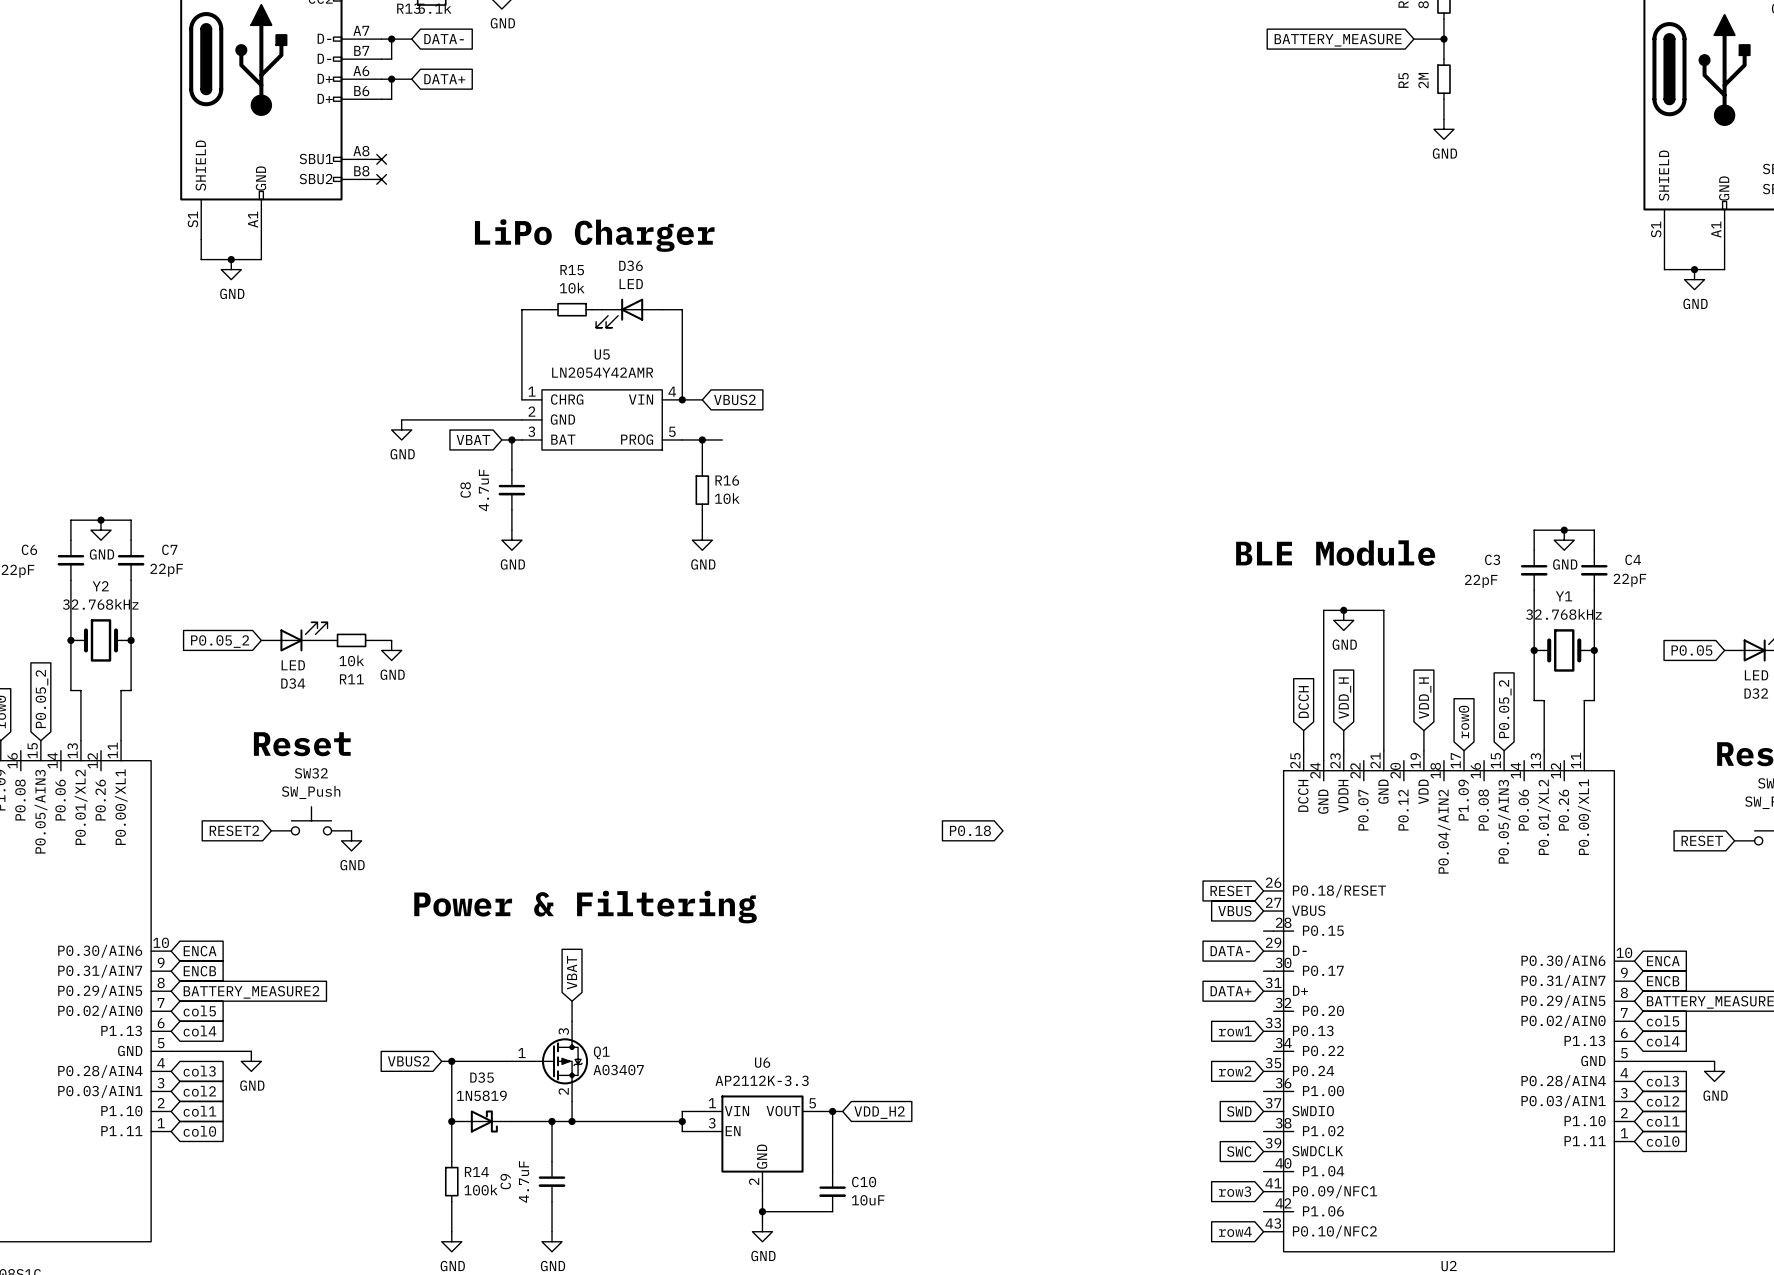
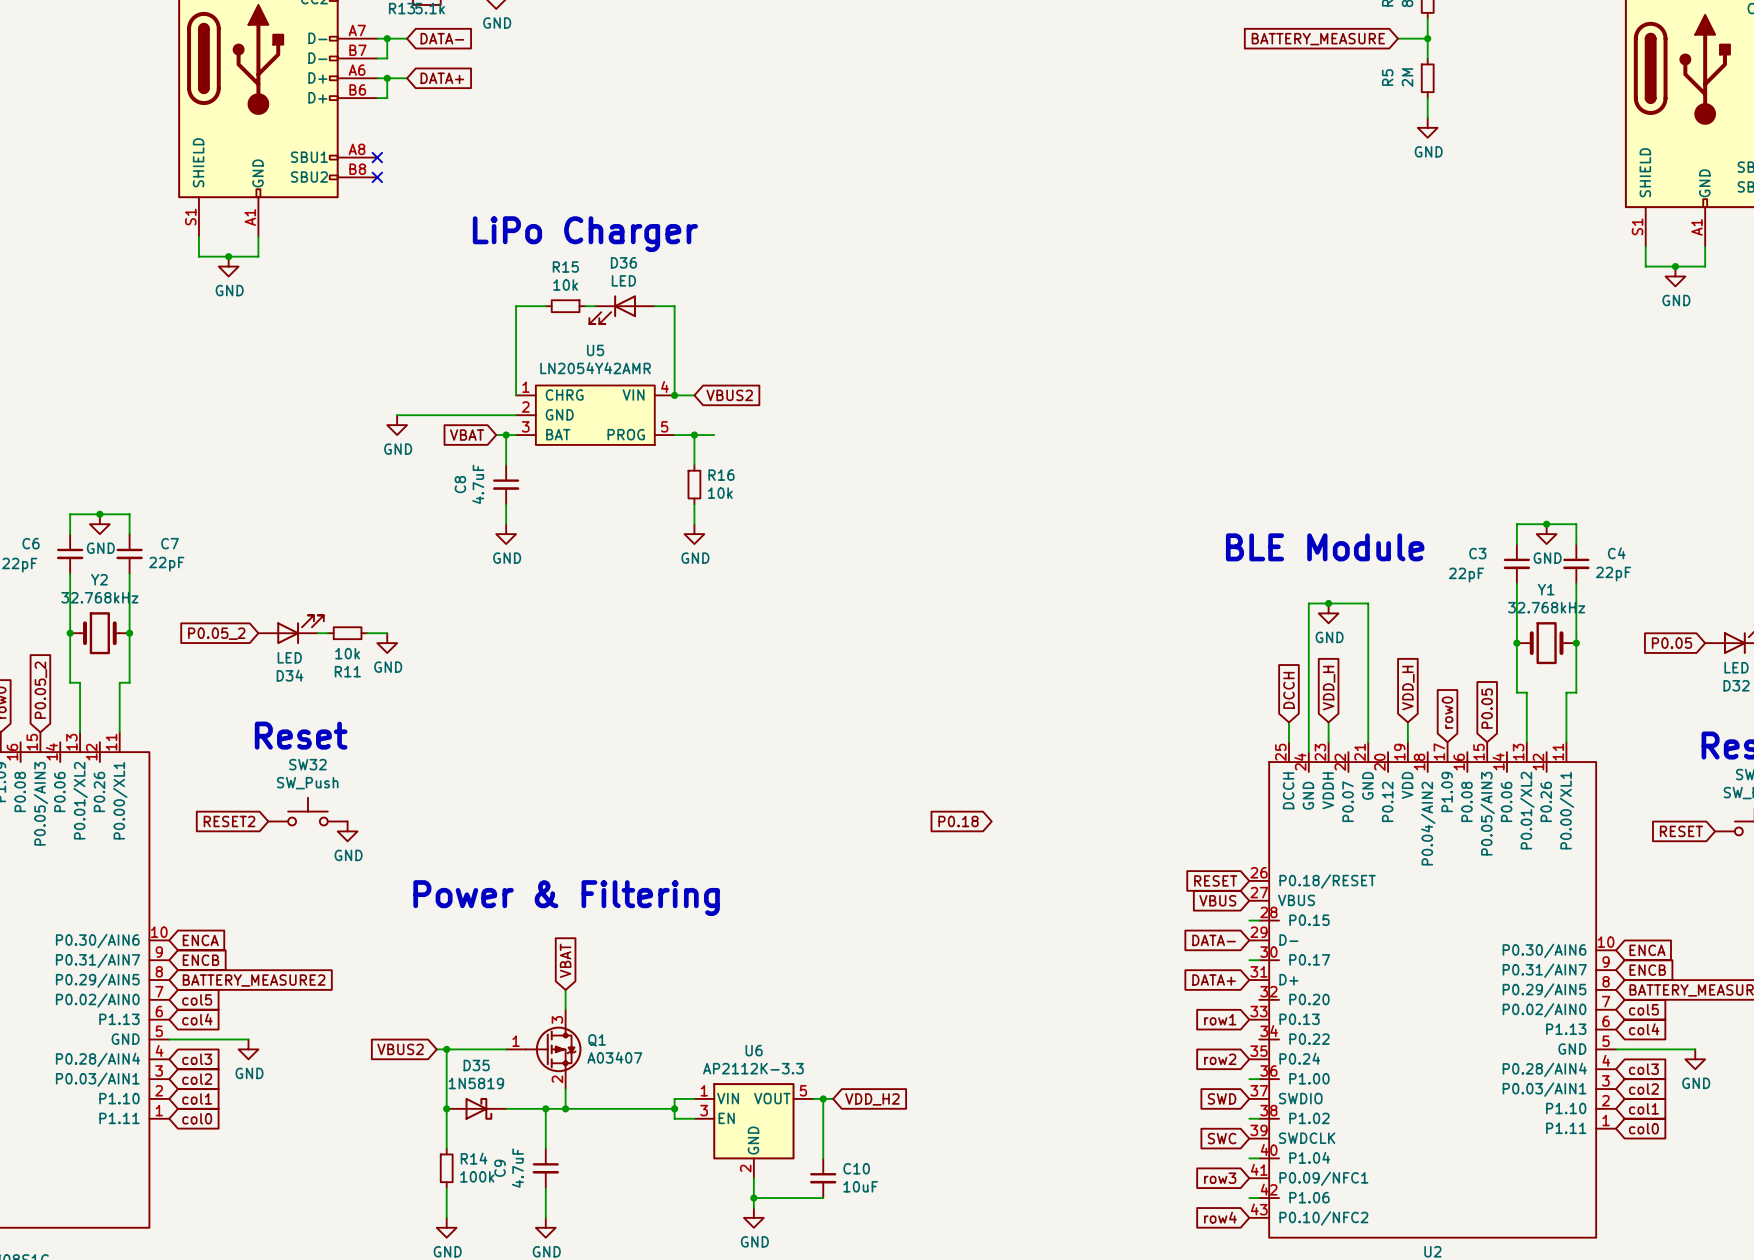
global label: P0.05_2 (1505, 709) -> P0.05 (1487, 708)

